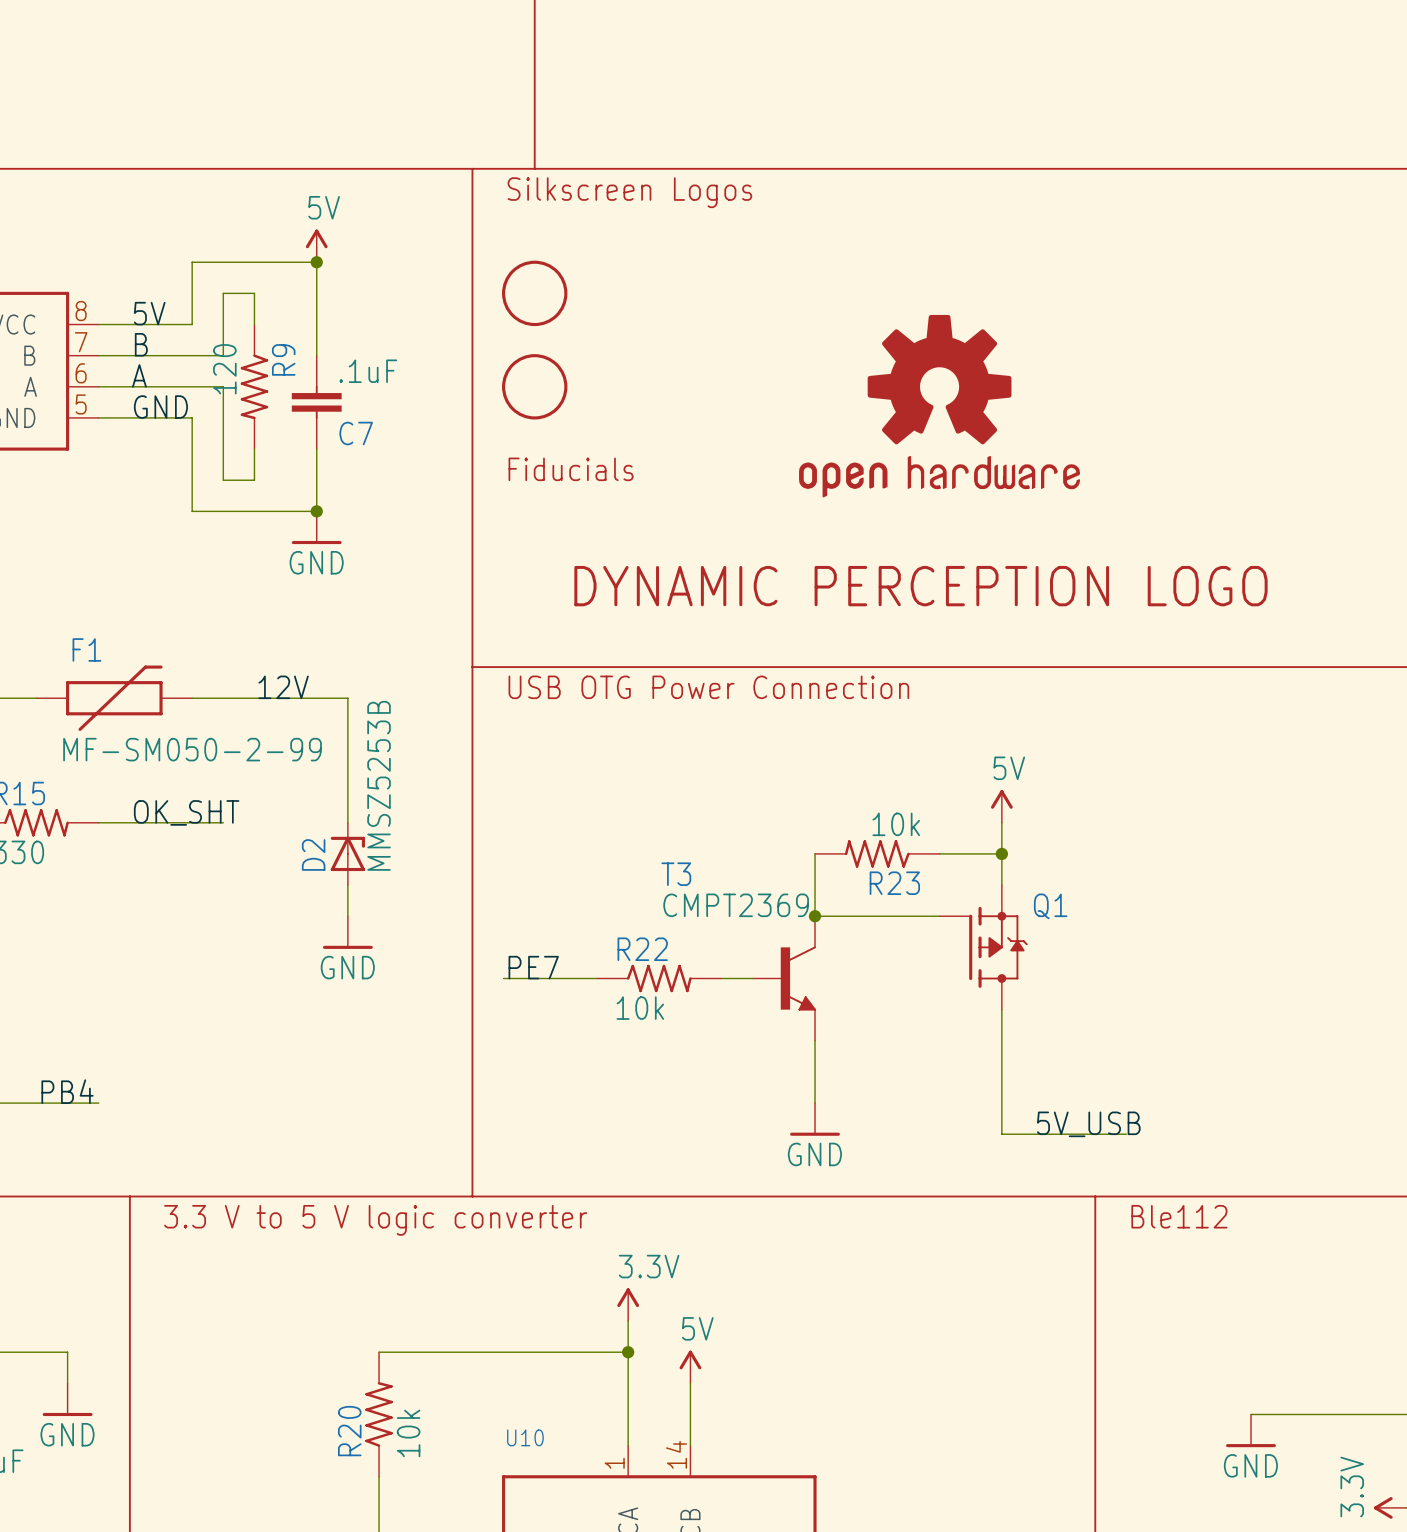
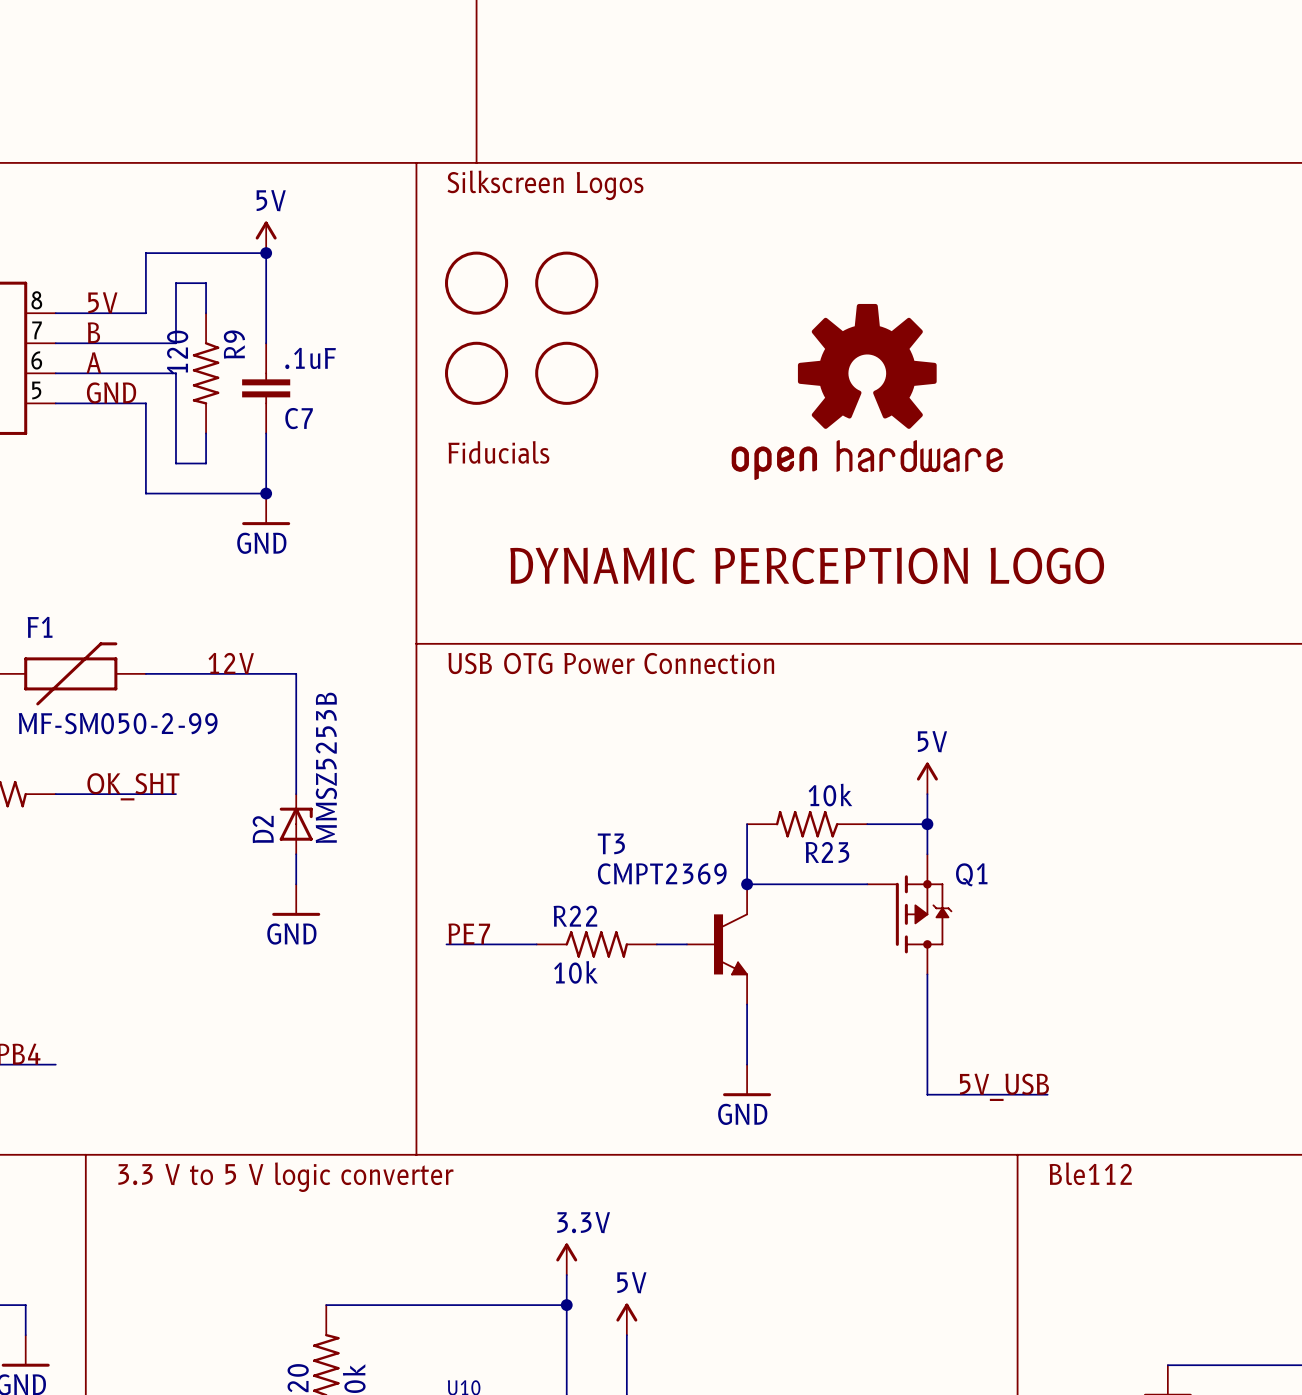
part: none -> (566, 283)
part: none -> (566, 373)

